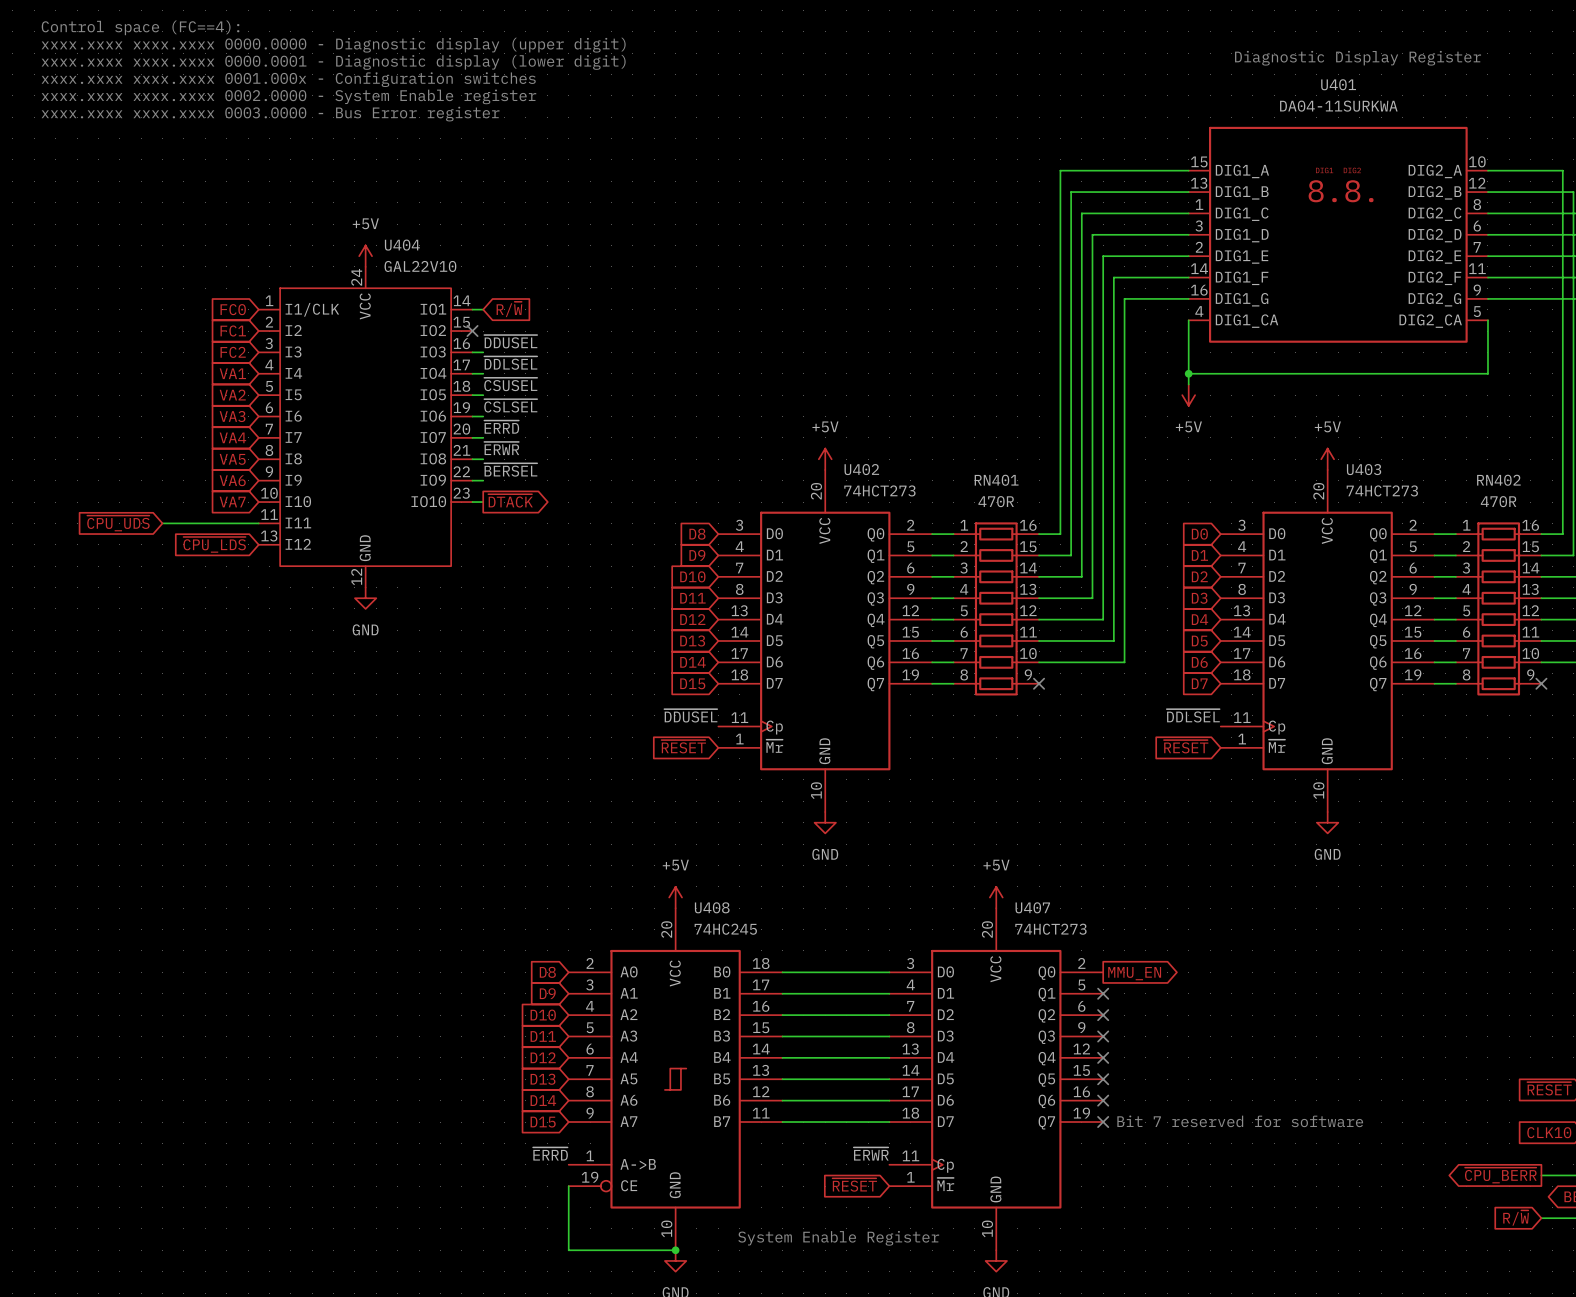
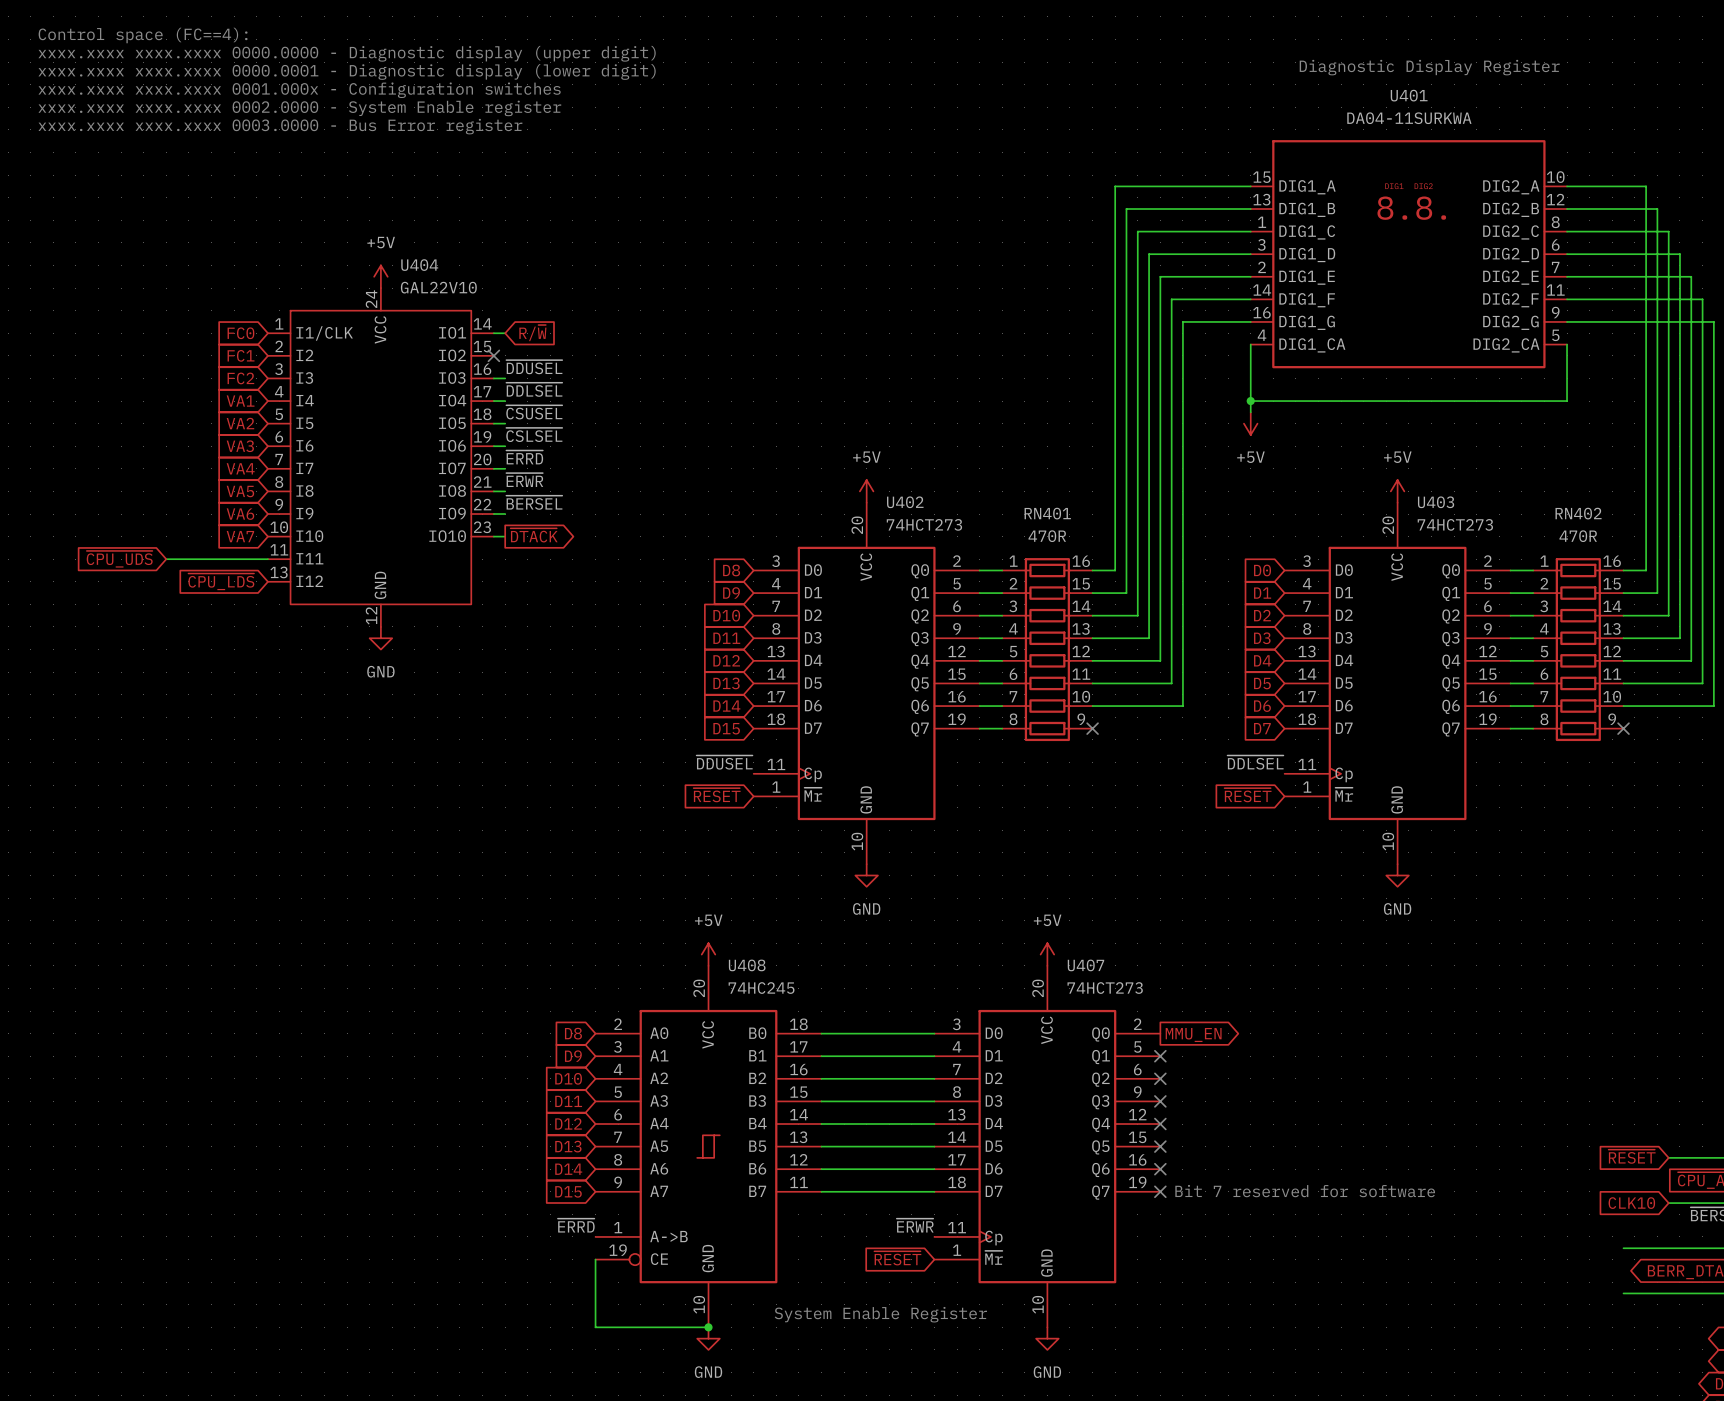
global label: ~{CPU_BERR} (1500, 1175) -> none
global label: R/~{W} (1516, 1218) -> none

